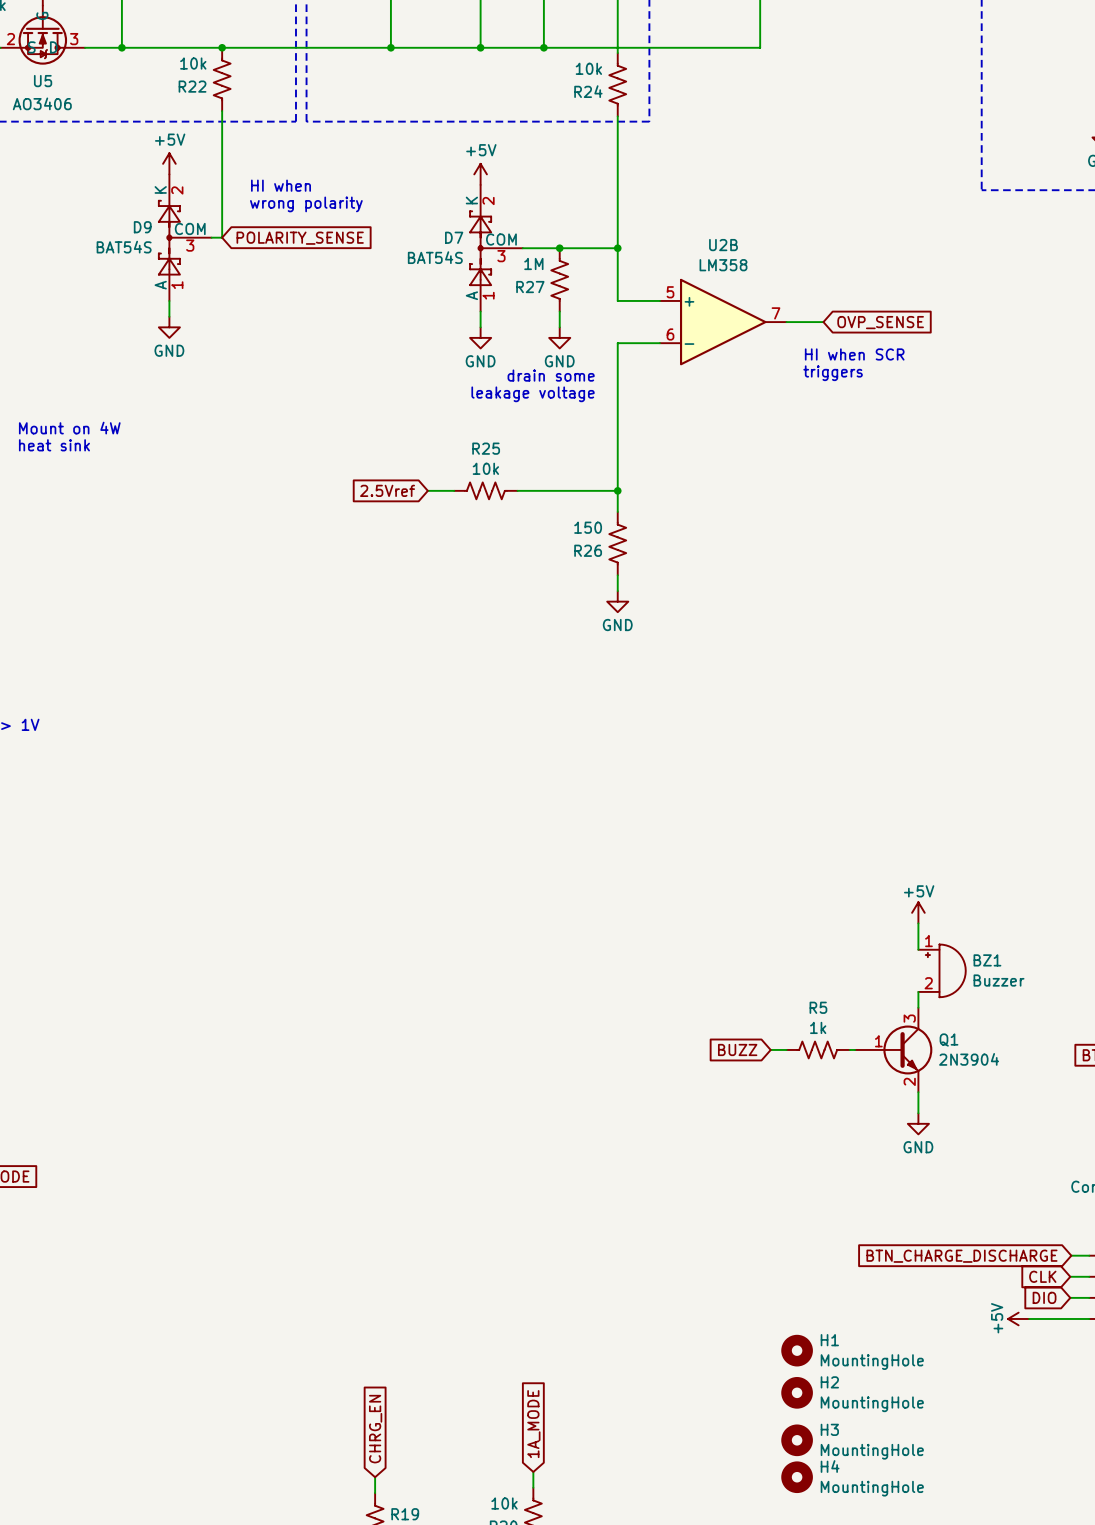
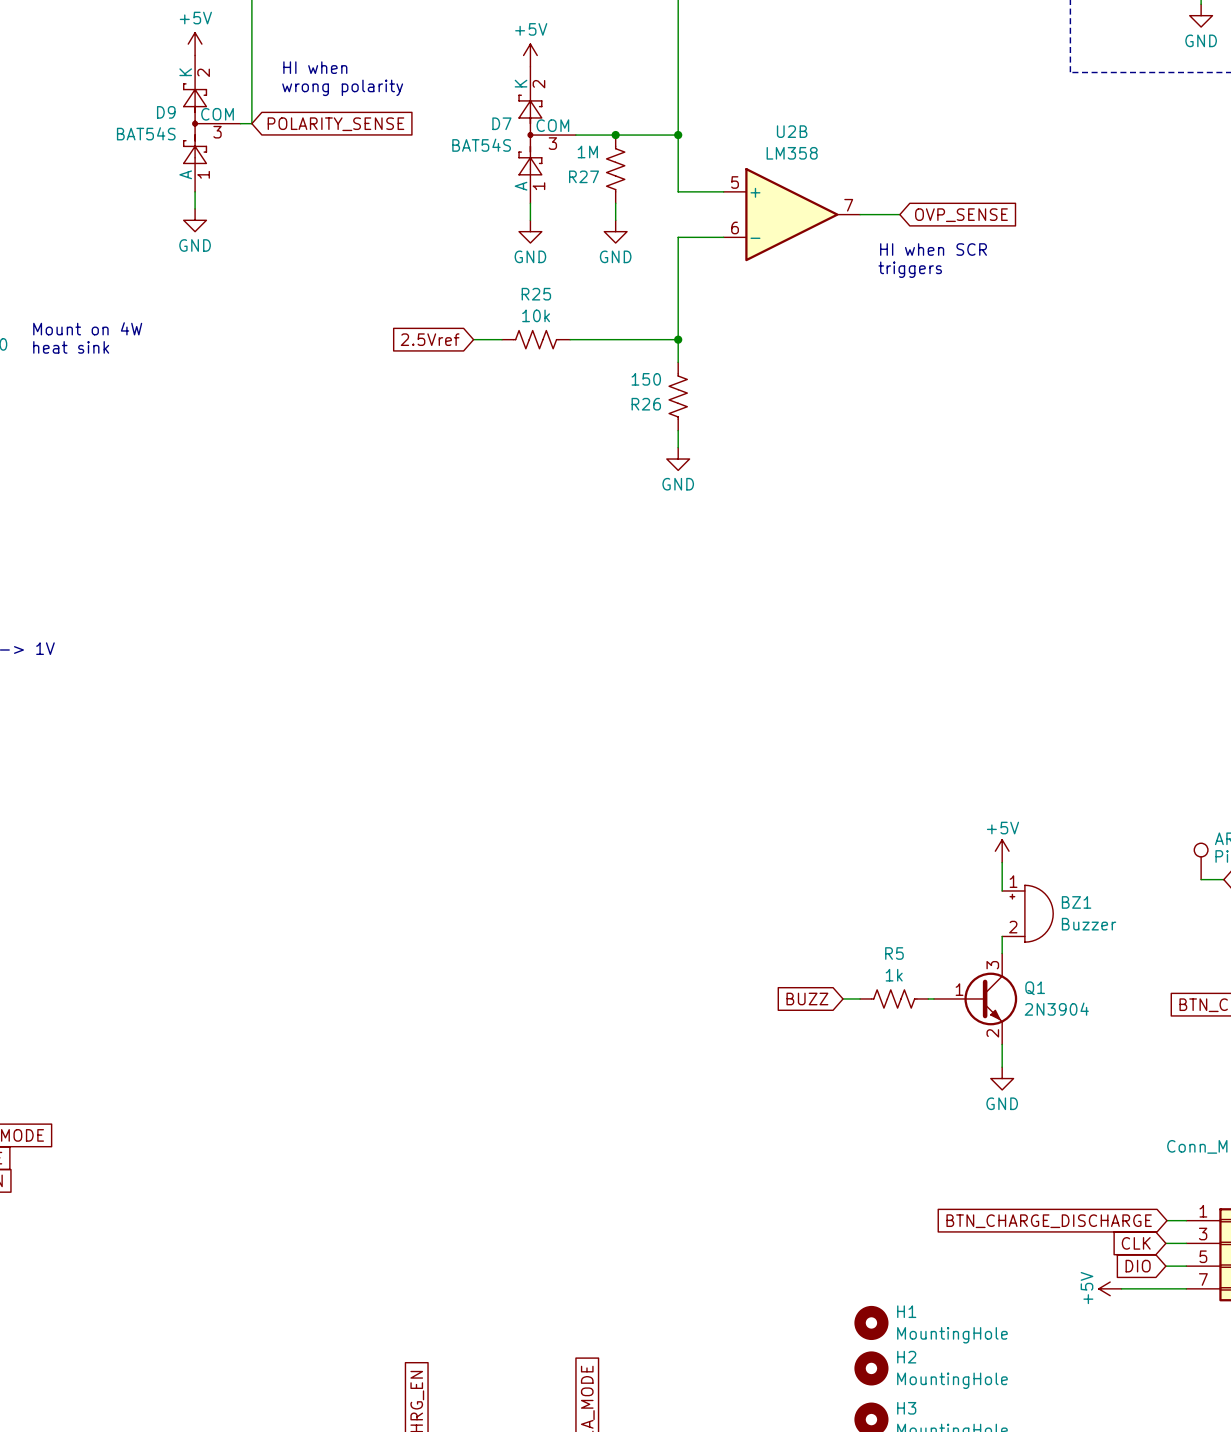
text: drain some (551, 375) -> none
text: leakage voltage (533, 394) -> none
junction: none -> (678, 339)
global label position: 2.5Vref (387, 490) -> 2.5Vref (430, 339)
wire: (427, 490) (454, 490) -> (473, 339) (501, 339)
R25 position: (485, 490) -> (536, 339)
wire: (517, 490) (617, 490) -> (570, 339) (678, 339)
junction: (617, 490) -> none
R26 position: (617, 543) -> (678, 396)
wire: (617, 575) (617, 591) -> (678, 430) (678, 447)
power symbol position: GND (617, 601) -> GND (678, 459)

